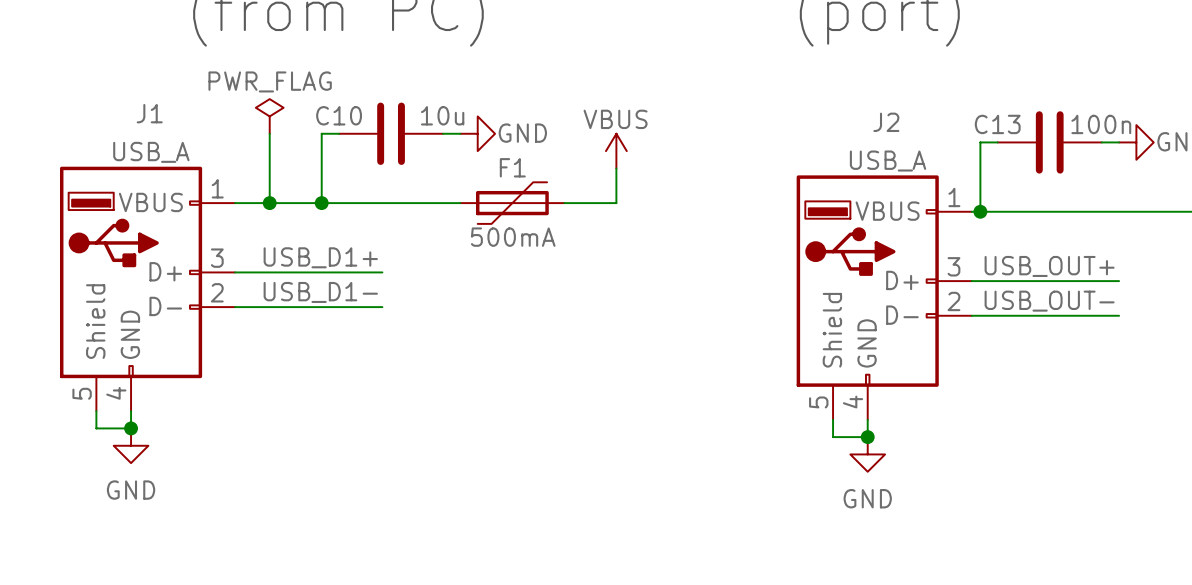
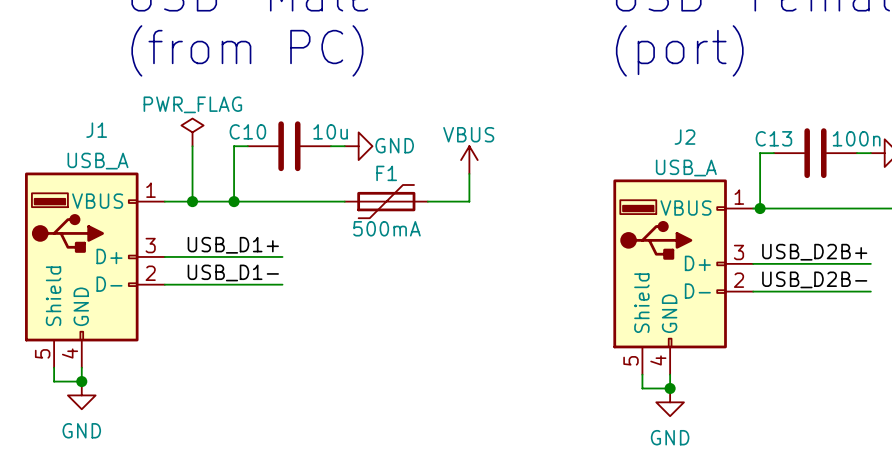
label: USB_OUT+ (1049, 266) -> USB_D2B+ (814, 252)
label: USB_OUT- (1049, 301) -> USB_D2B- (814, 279)

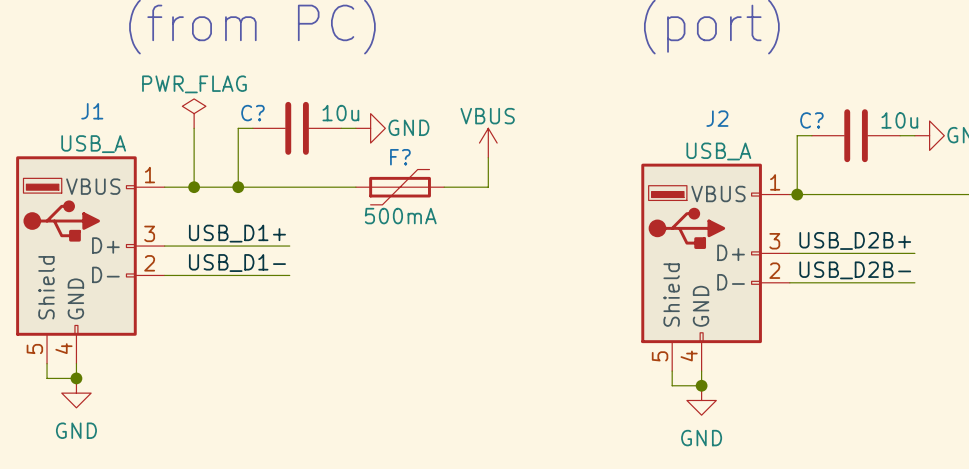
C10 name: C10 (247, 131) -> C? (252, 113)
C13 name: C13 (773, 138) -> C? (811, 120)
C13 value: 100n (856, 138) -> 10u (899, 120)
F1 name: F1 (386, 173) -> F? (400, 157)

